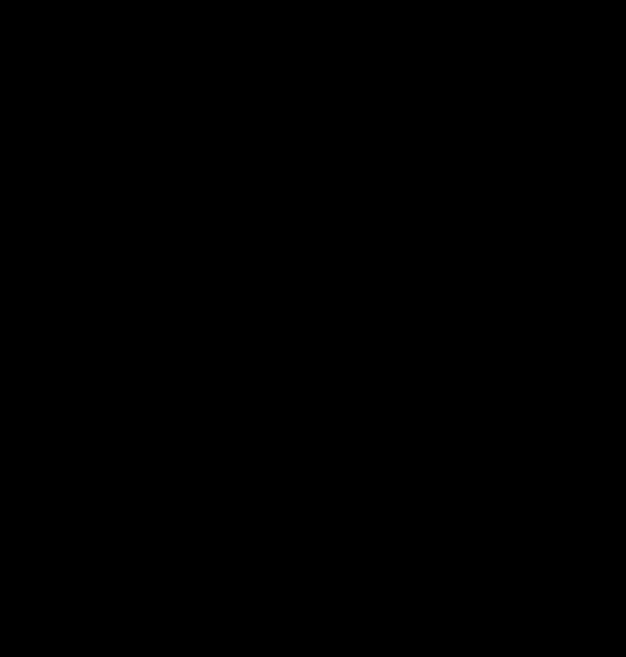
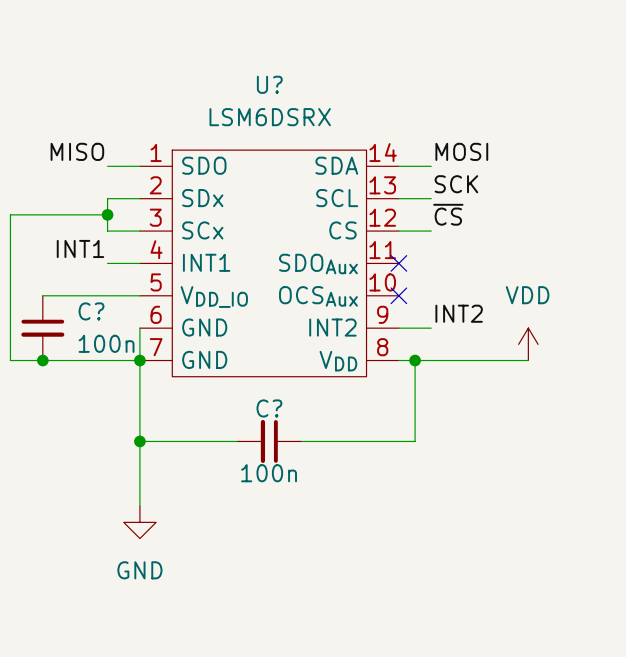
label: none -> MISO (77, 151)
label: none -> MOSI (461, 151)
wire: none -> (107, 166) (139, 166)
wire: none -> (398, 166) (431, 166)
label: none -> SCK (456, 184)
wire: none -> (139, 198) (107, 198) (107, 231) (139, 231)
wire: none -> (398, 198) (431, 198)
wire: none -> (107, 214) (10, 214) (10, 360) (139, 360)
junction: none -> (107, 214)
label: none -> ~{CS} (448, 214)
wire: none -> (398, 231) (431, 231)
label: none -> INT1 (80, 248)
wire: none -> (107, 263) (139, 263)
U?: none -> LSM6DSRX (269, 263)
no-connect mark: none -> (398, 263)
wire: none -> (42, 295) (139, 295)
no-connect mark: none -> (398, 295)
label: none -> INT2 (459, 313)
C?: none -> 100n (42, 328)
wire: none -> (139, 328) (139, 506)
wire: none -> (398, 328) (431, 328)
power symbol: none -> VDD (528, 344)
junction: none -> (42, 360)
junction: none -> (139, 360)
wire: none -> (398, 360) (528, 360)
wire: none -> (415, 360) (415, 441) (301, 441)
junction: none -> (415, 360)
wire: none -> (139, 441) (237, 441)
junction: none -> (139, 441)
C?: none -> 100n (269, 441)
power symbol: none -> GND (139, 522)

